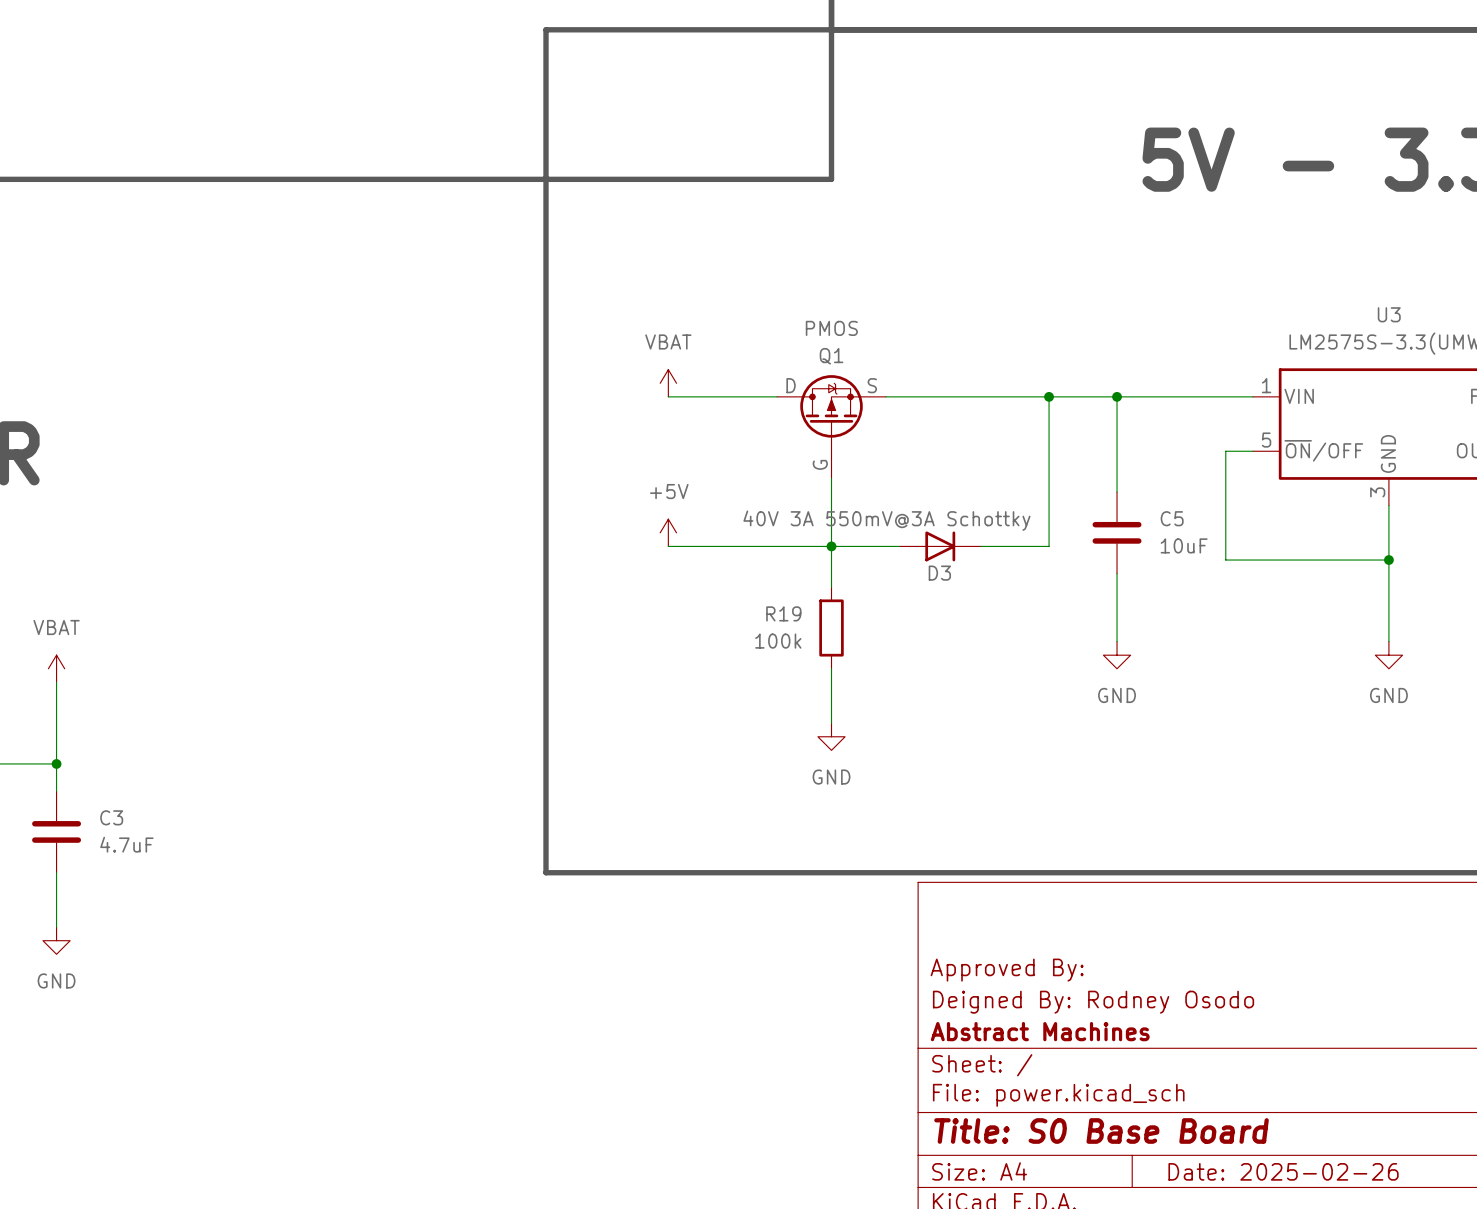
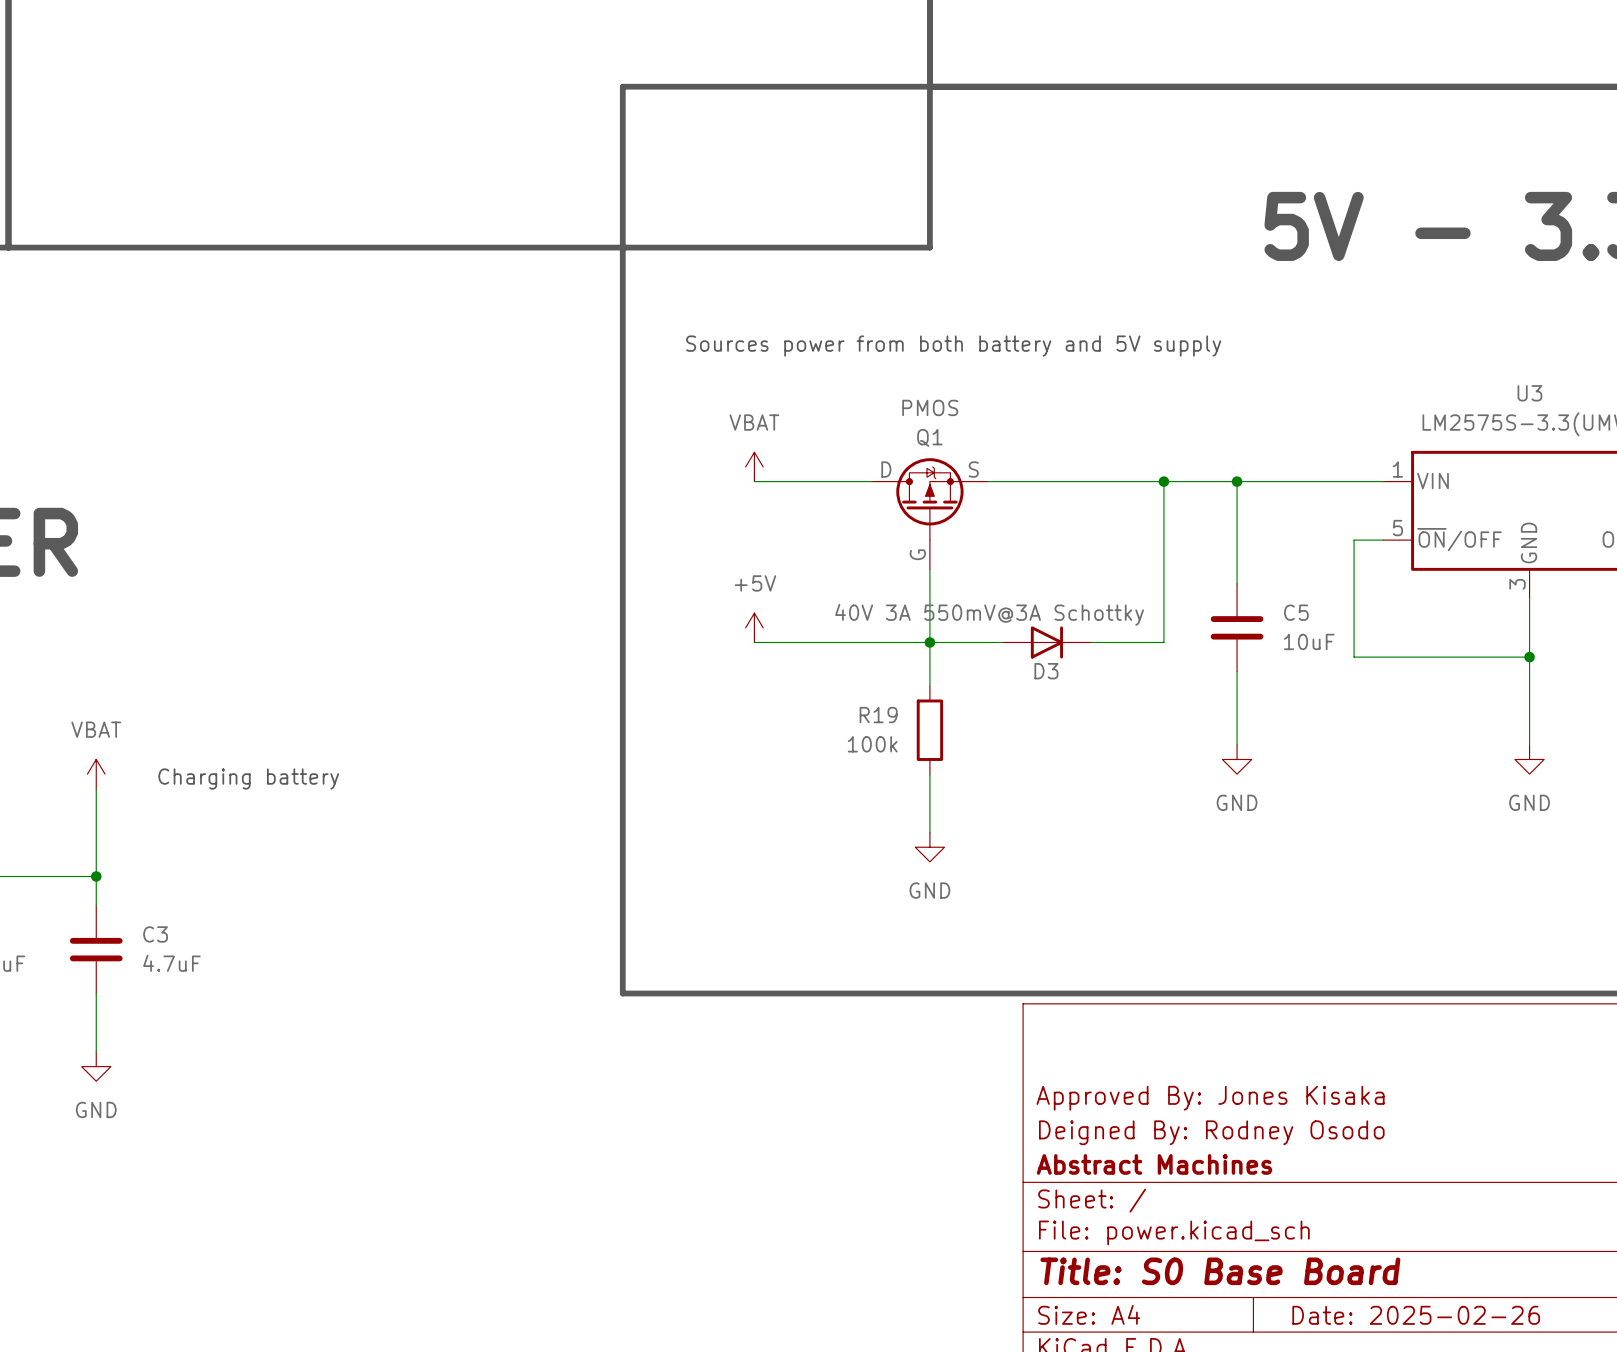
text: none -> Sources power from both battery and 5V supply (953, 346)
text: none -> Charging battery (248, 778)
title block: Approved By: (1007, 970) -> Approved By: Jones Kisaka (1210, 1098)

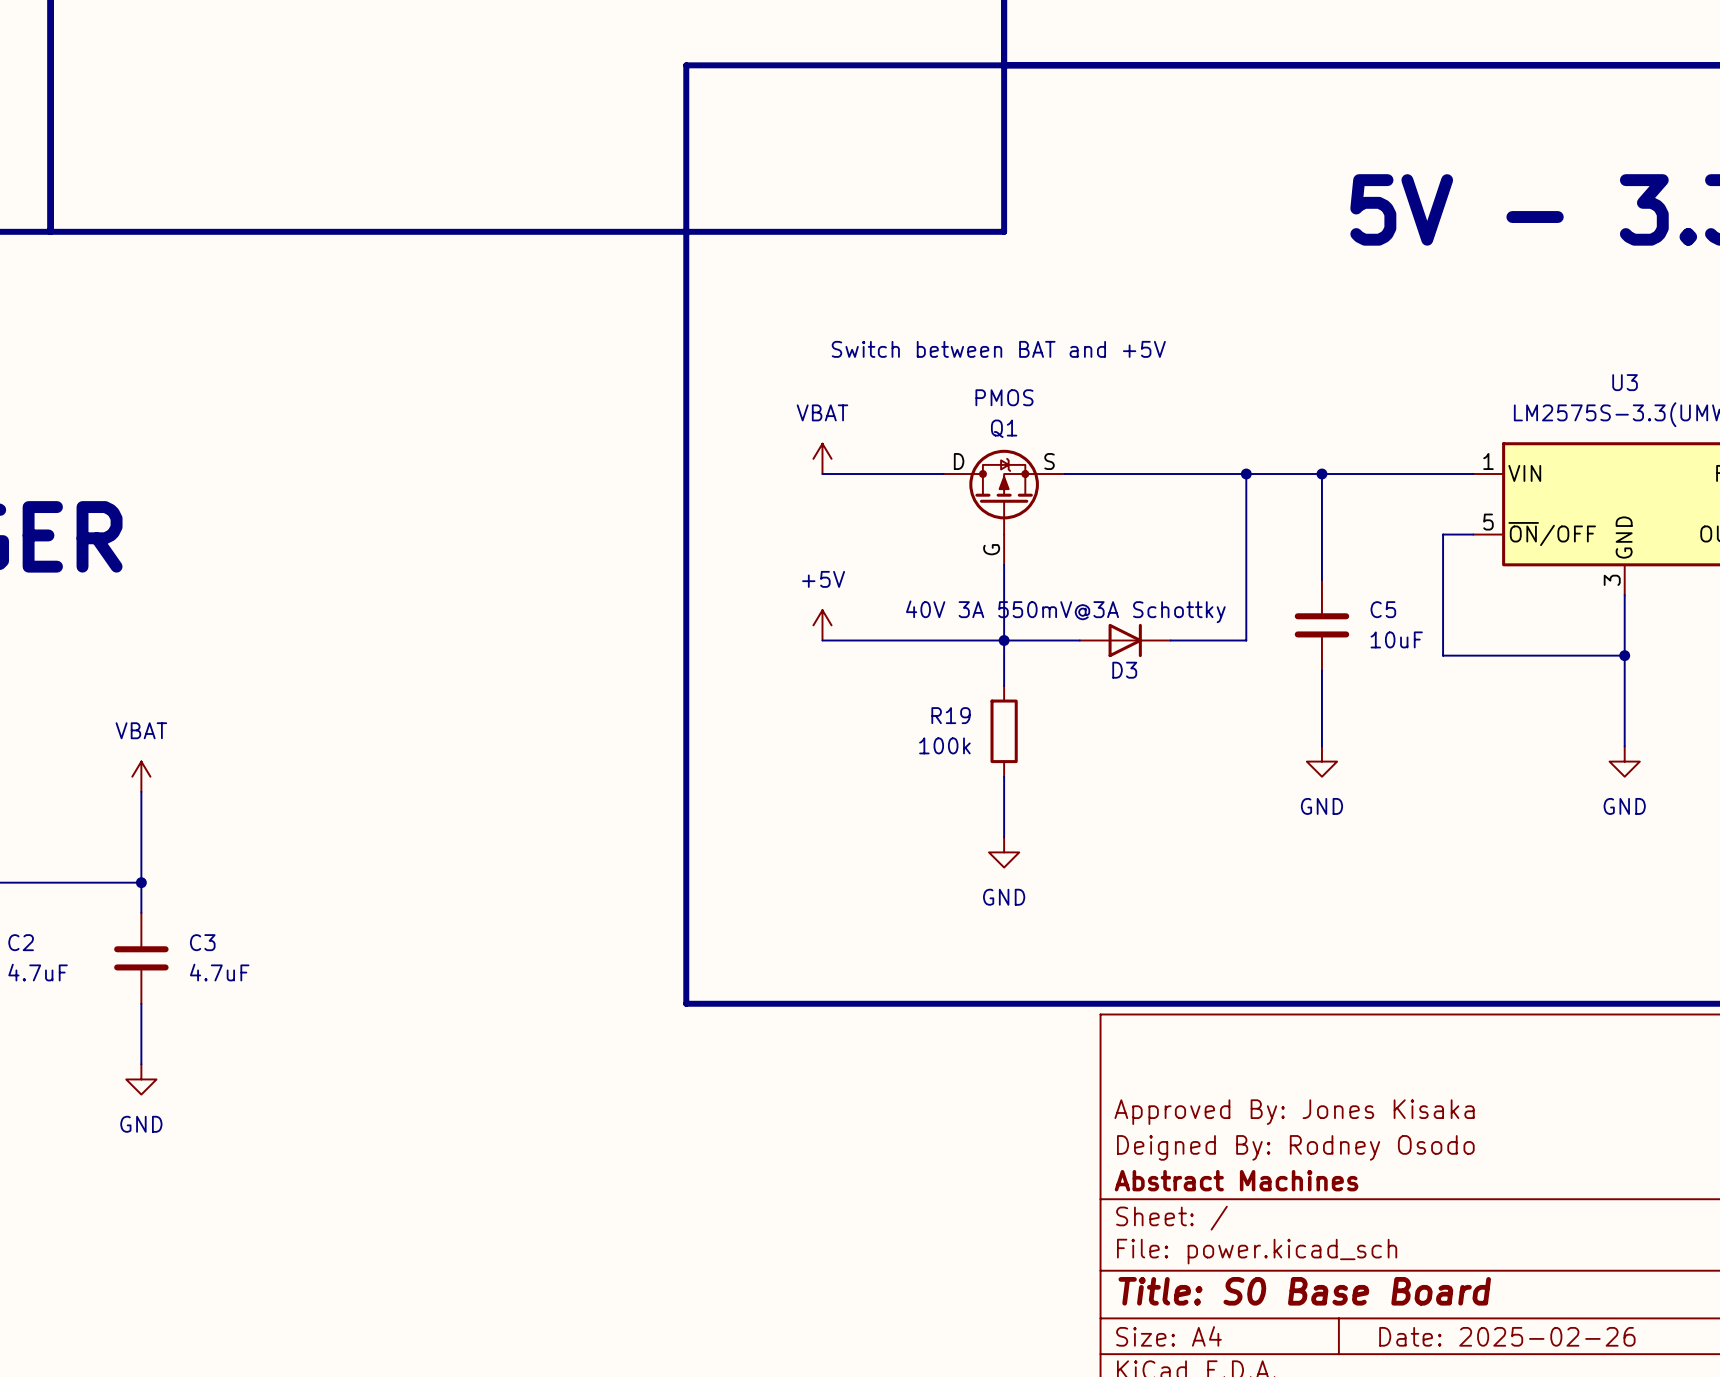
text: Sources power from both battery and 5V supply (953, 346) -> none
text: none -> Switch between BAT and +5V (998, 349)
text: Charging battery (248, 778) -> none

